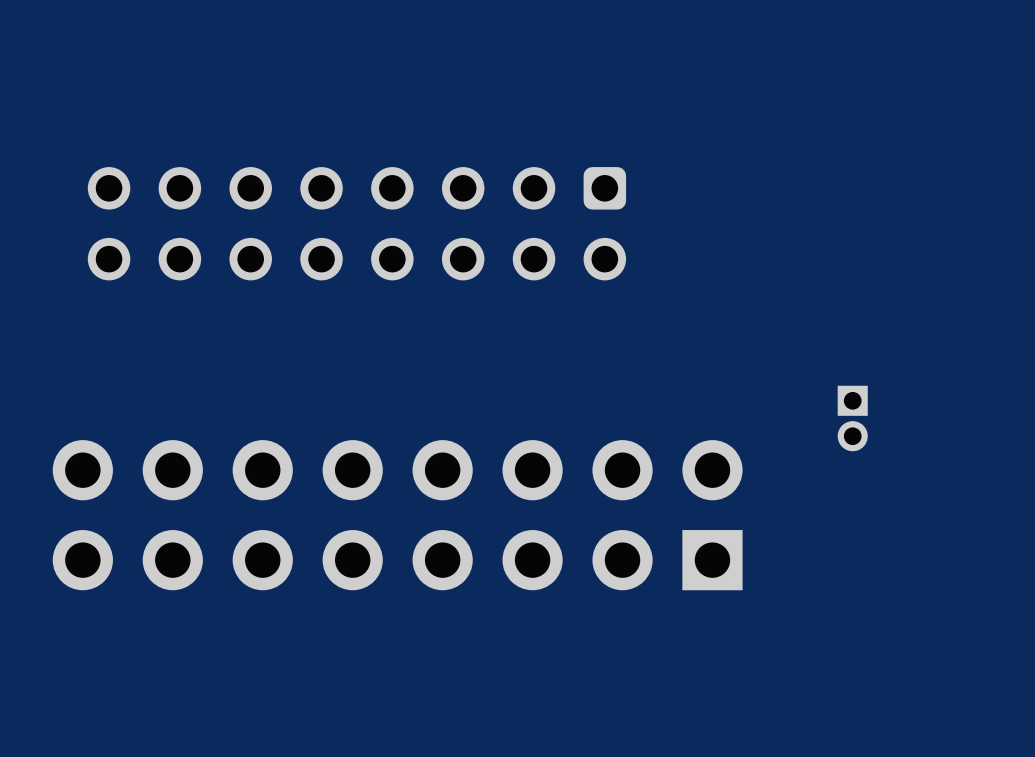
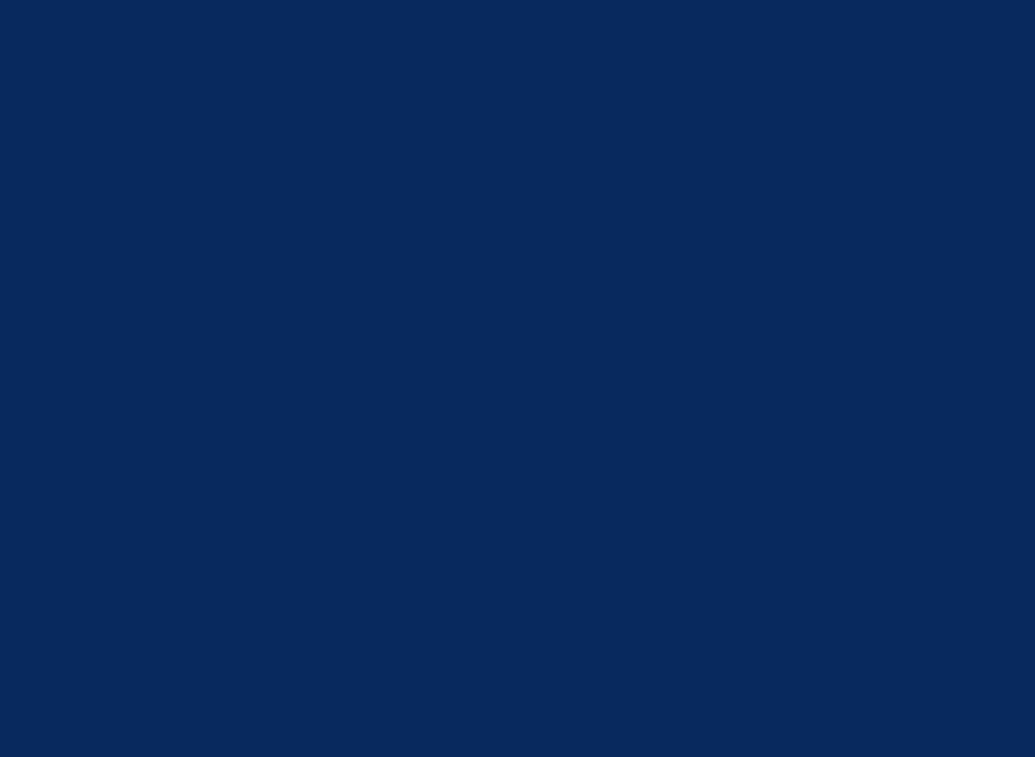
part: (356, 223) -> none
part: (852, 418) -> none
part: (397, 515) -> none

